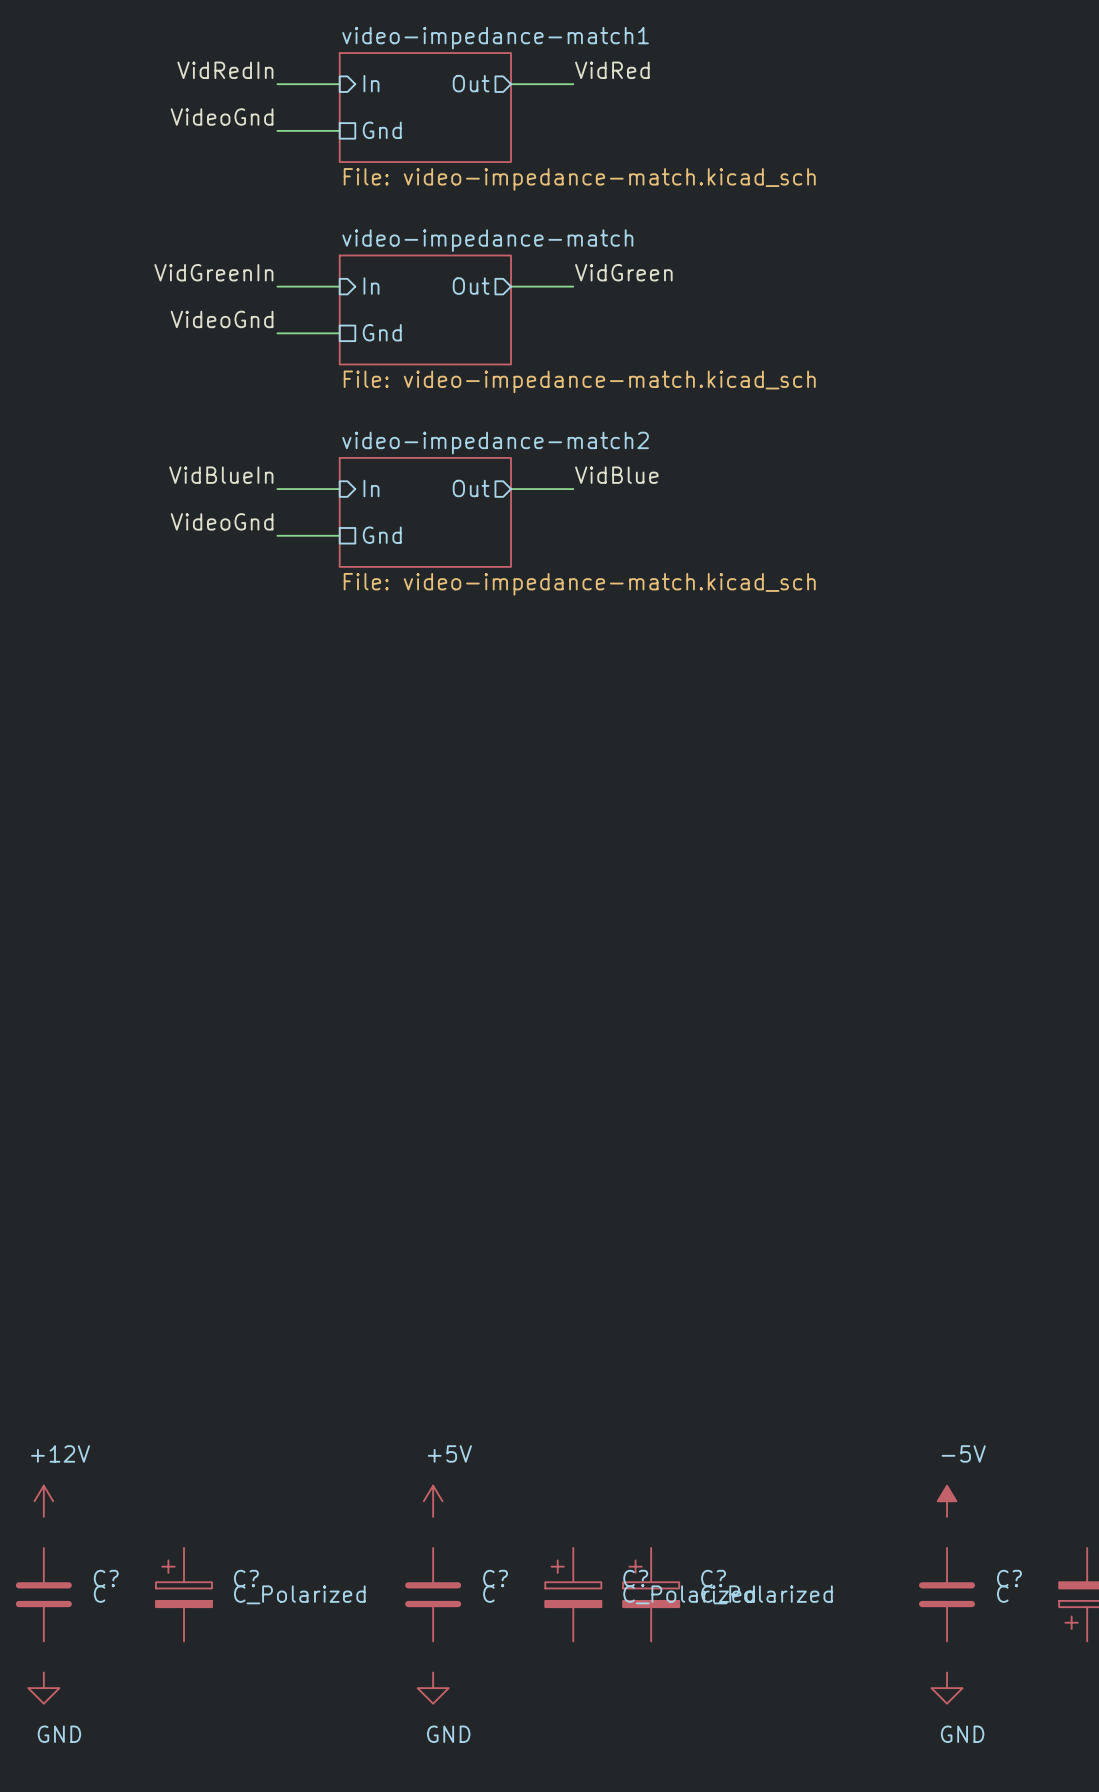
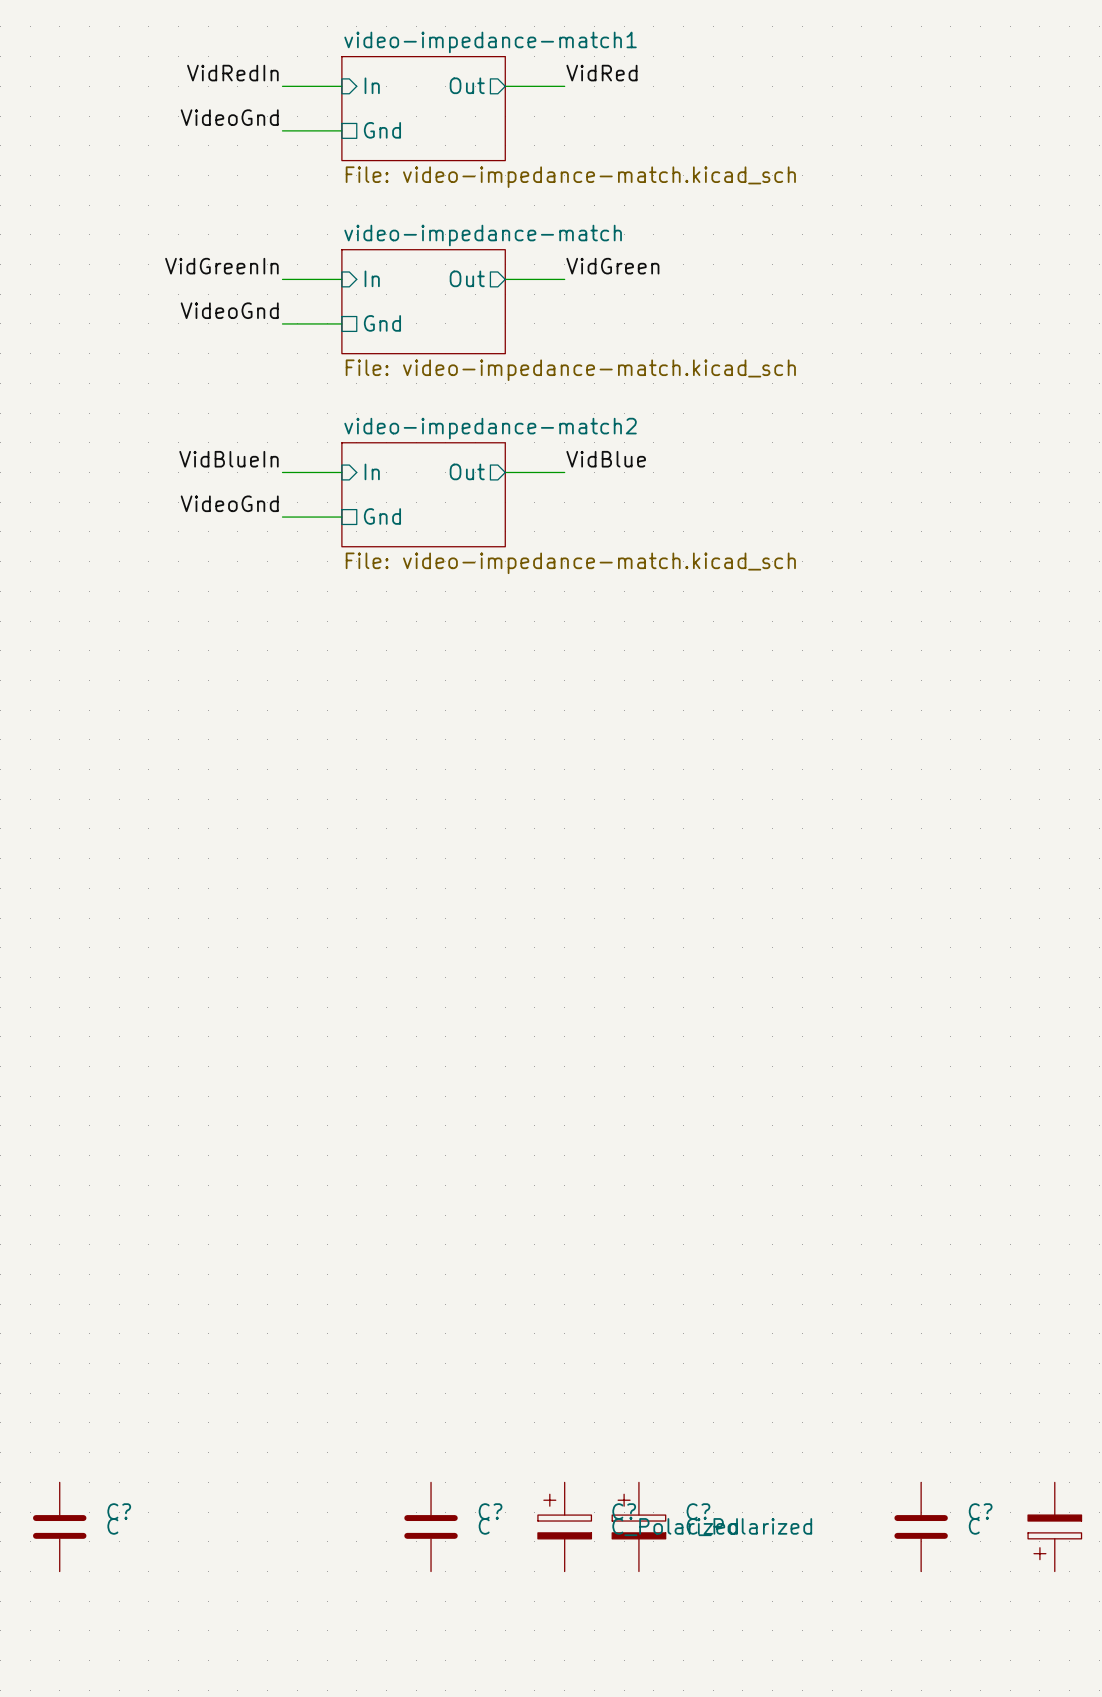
power symbol: +12V (43, 1501) -> none
power symbol: +5V (433, 1501) -> none
power symbol: -5V (947, 1501) -> none
C?: C_Polarized (183, 1594) -> none
power symbol: GND (43, 1688) -> none
power symbol: GND (433, 1688) -> none
power symbol: GND (947, 1688) -> none

